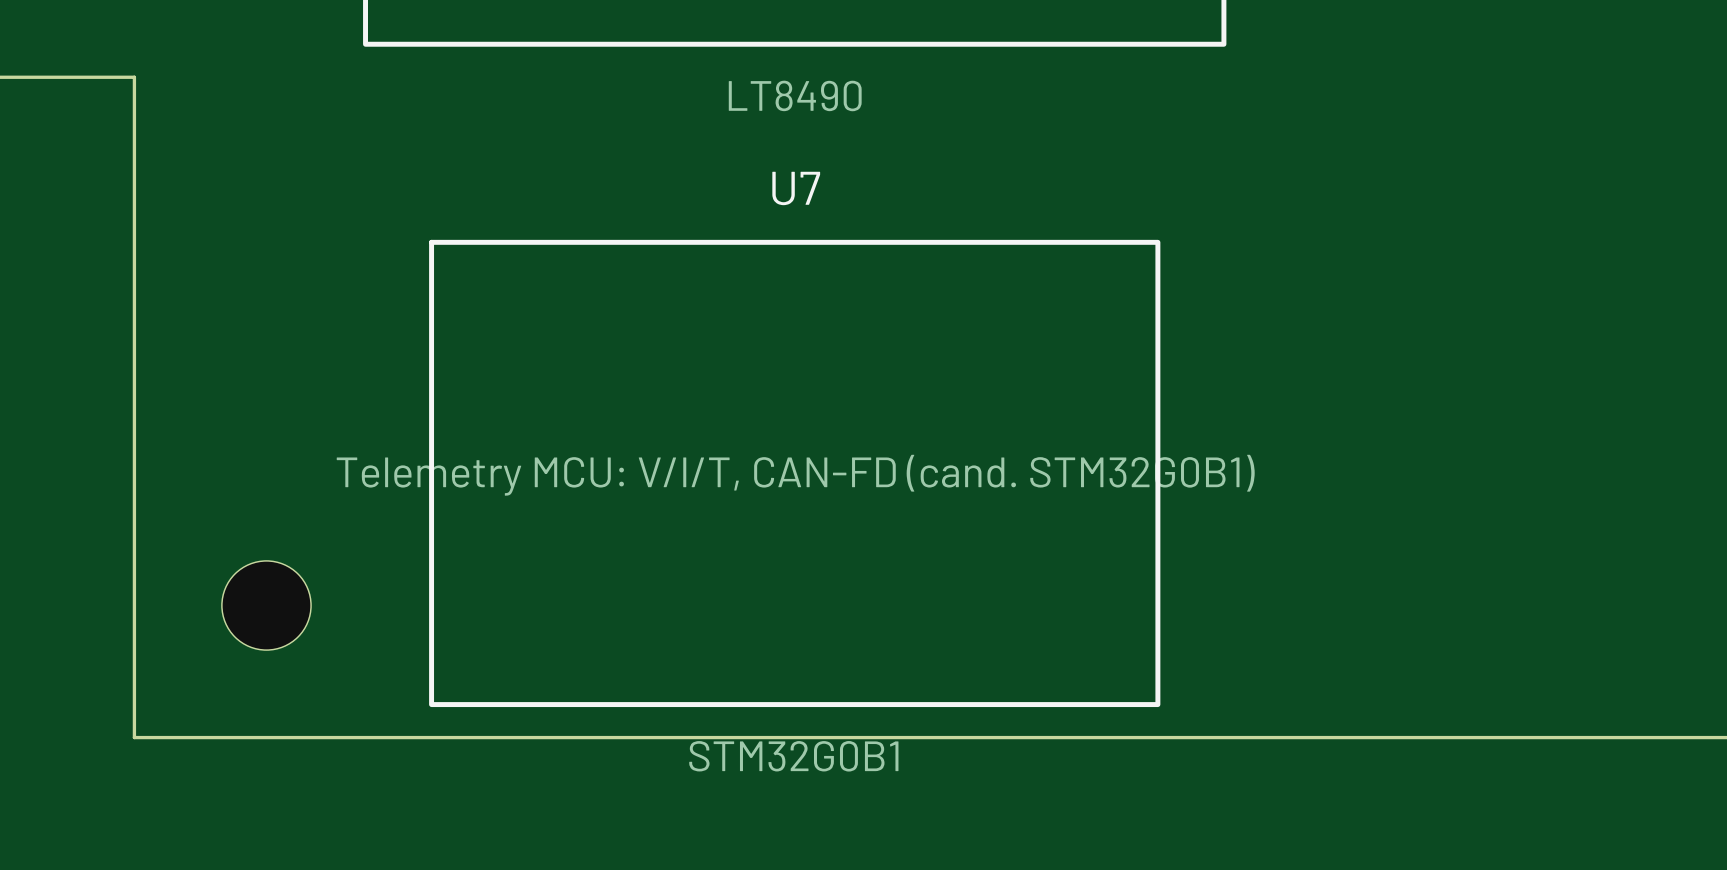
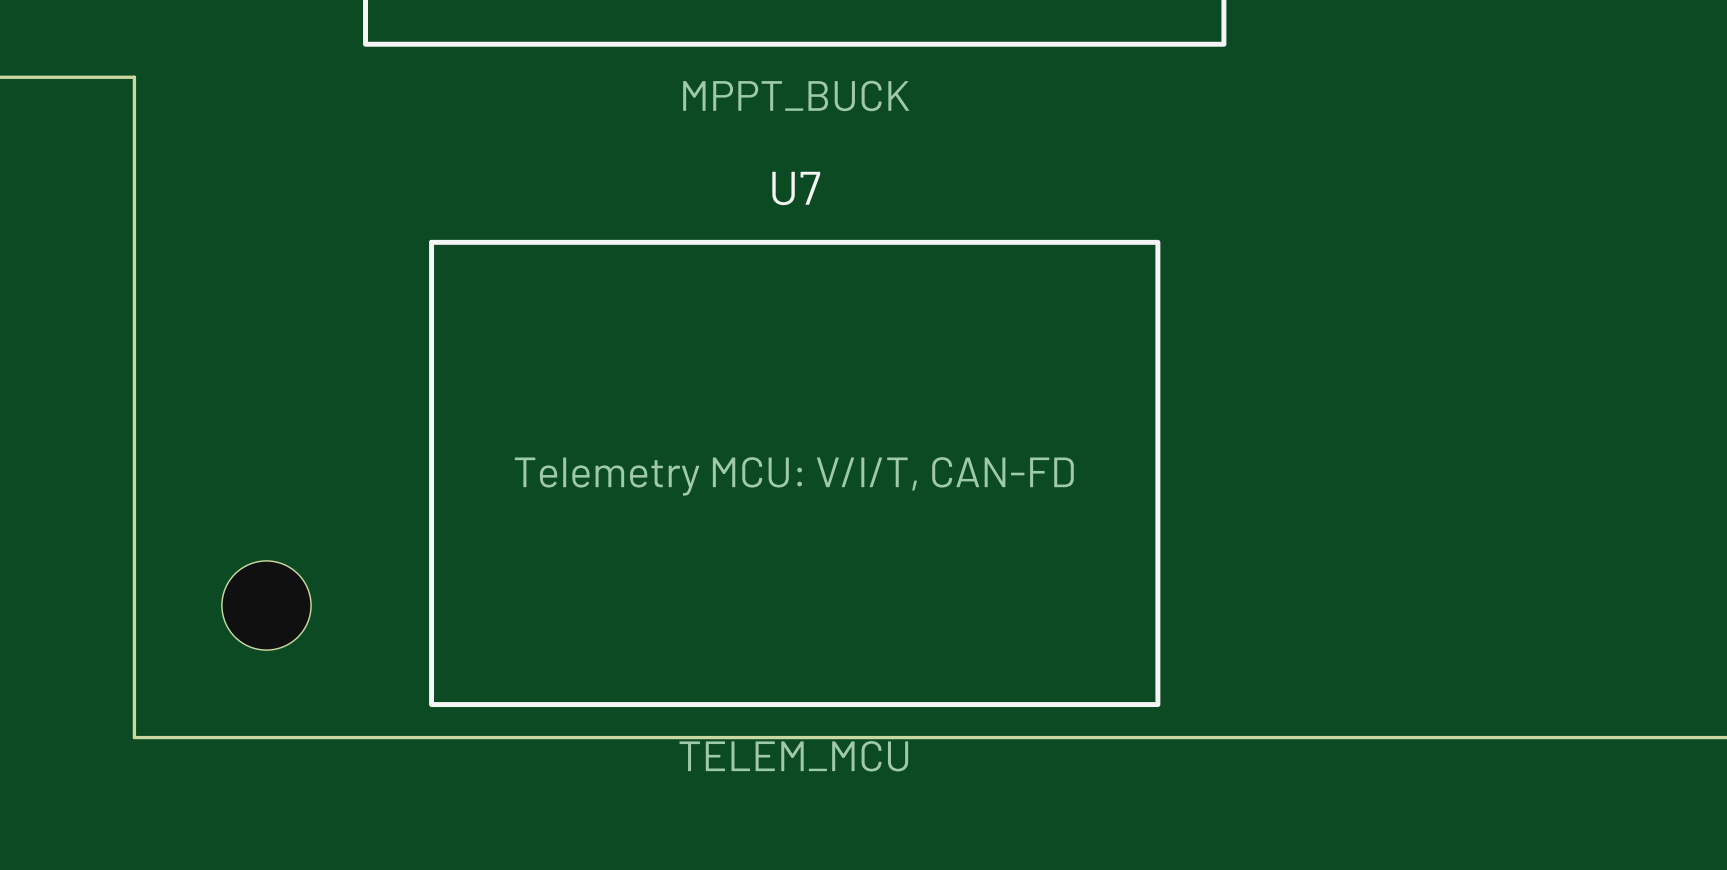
part value: LT8490 (795, 95) -> MPPT_BUCK (796, 95)
U7 text: Telemetry MCU: V/I/T, CAN-FD (cand. STM32G0B1) (795, 475) -> Telemetry MCU: V/I/T, CAN-FD (794, 476)
U7 value: STM32G0B1 (793, 756) -> TELEM_MCU (793, 756)

